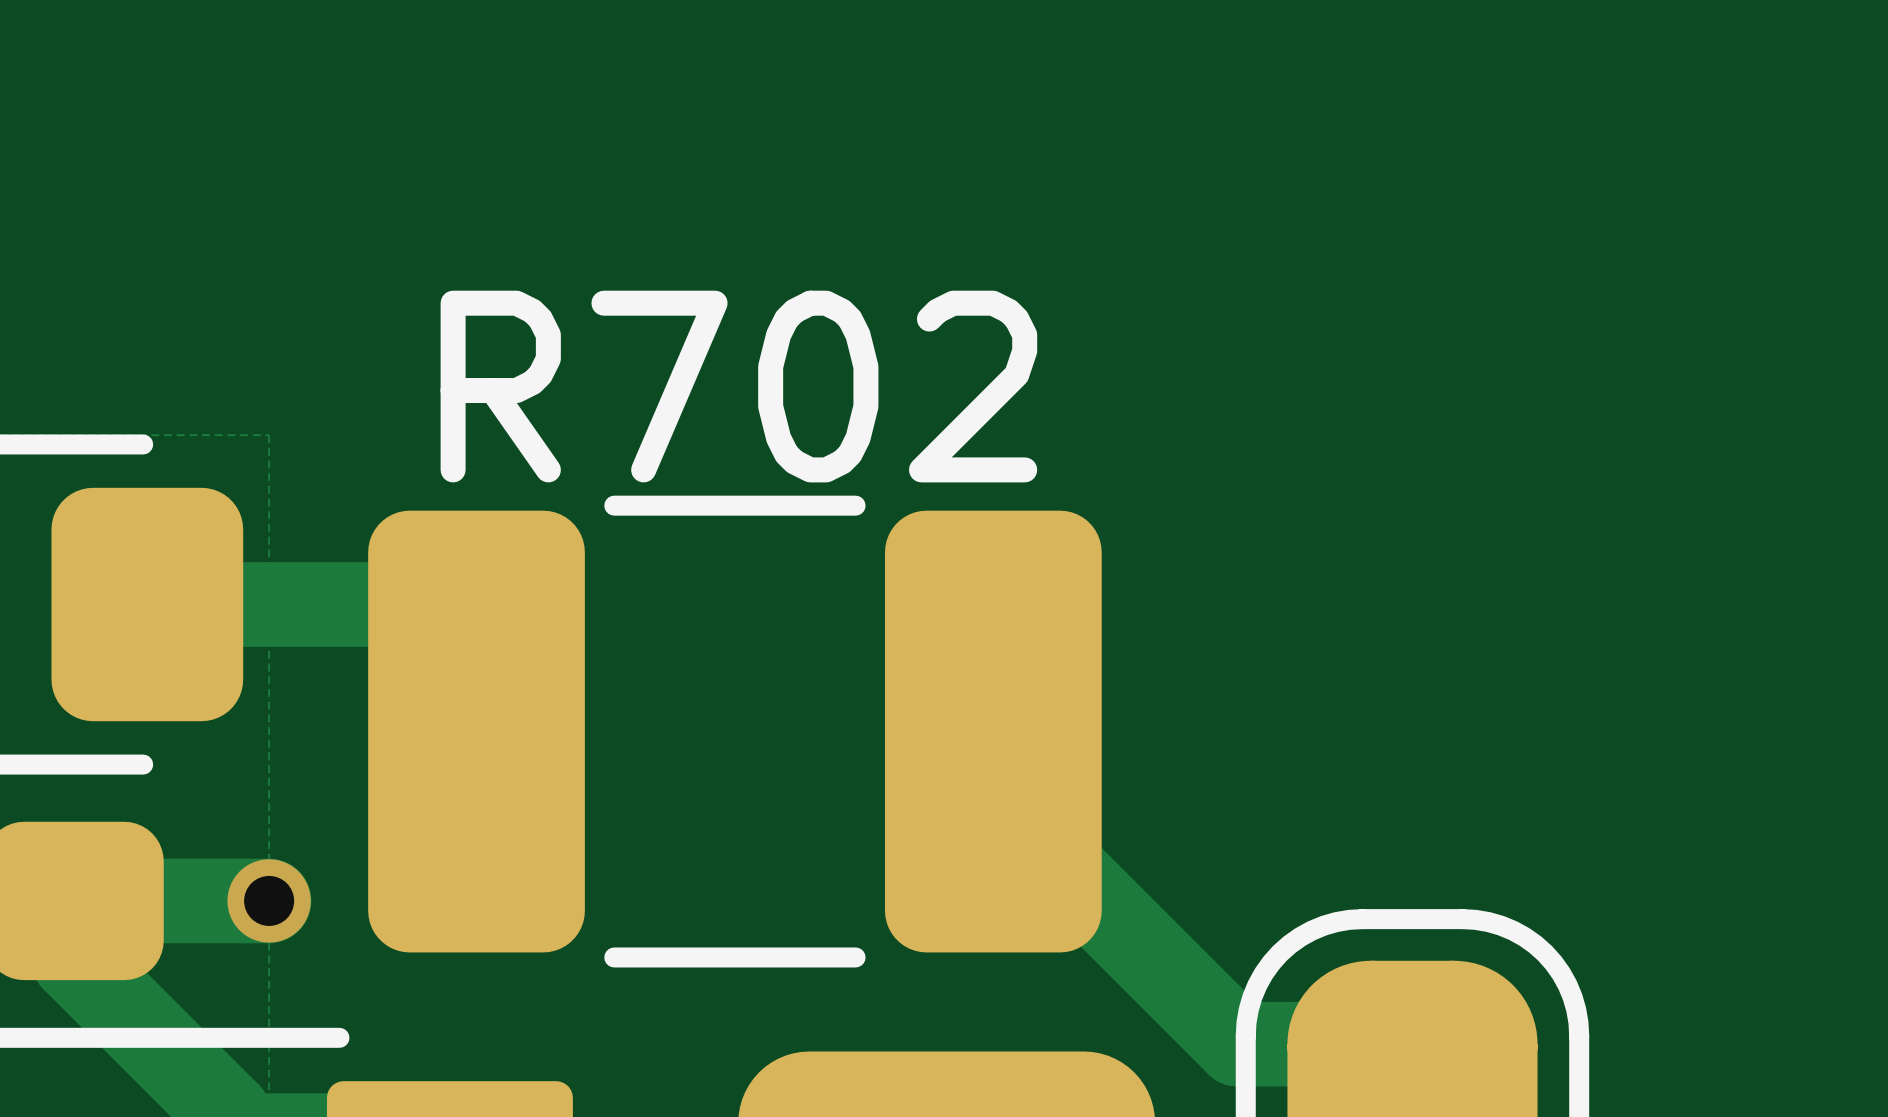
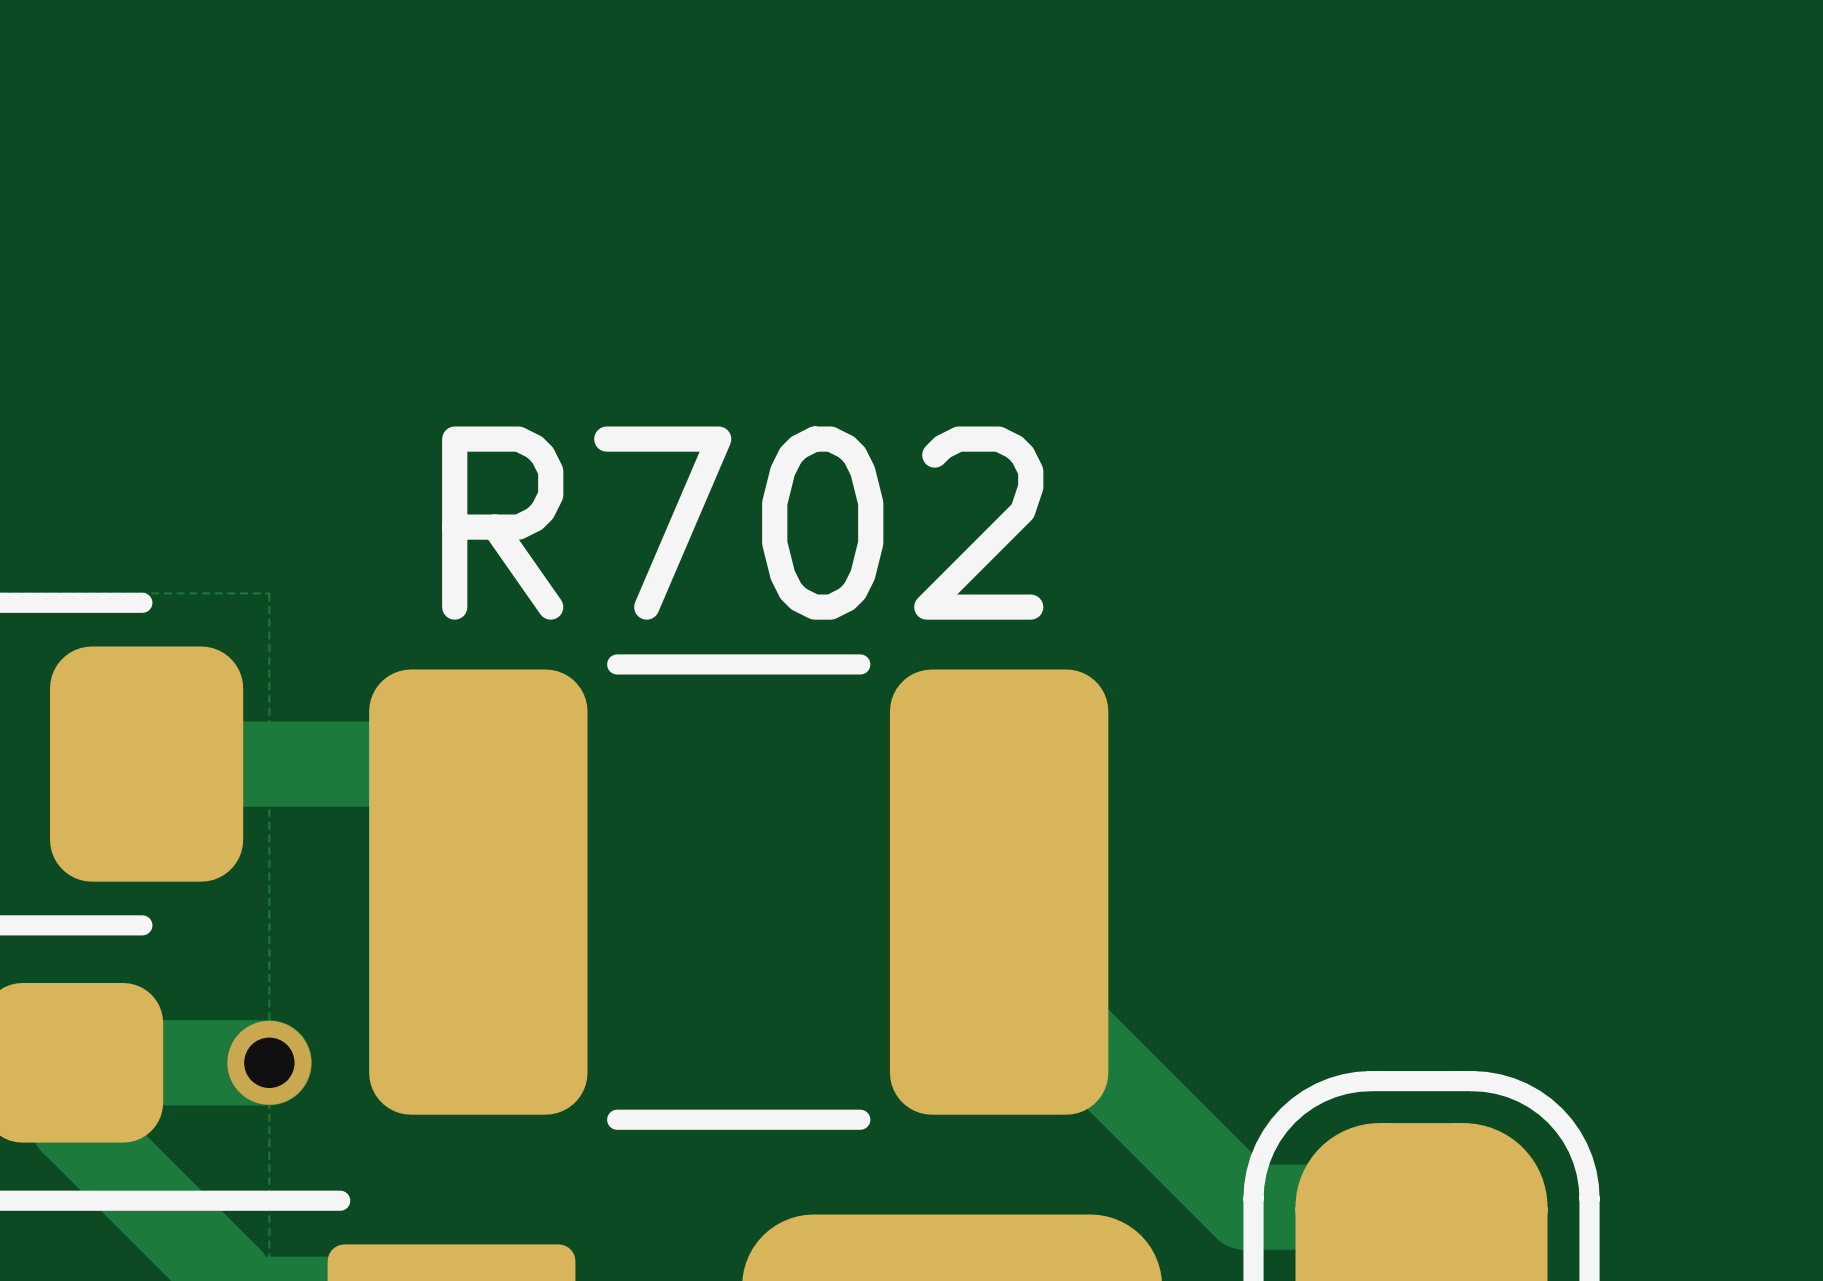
R702 name position: R702 (738, 386) -> R702 (742, 523)

